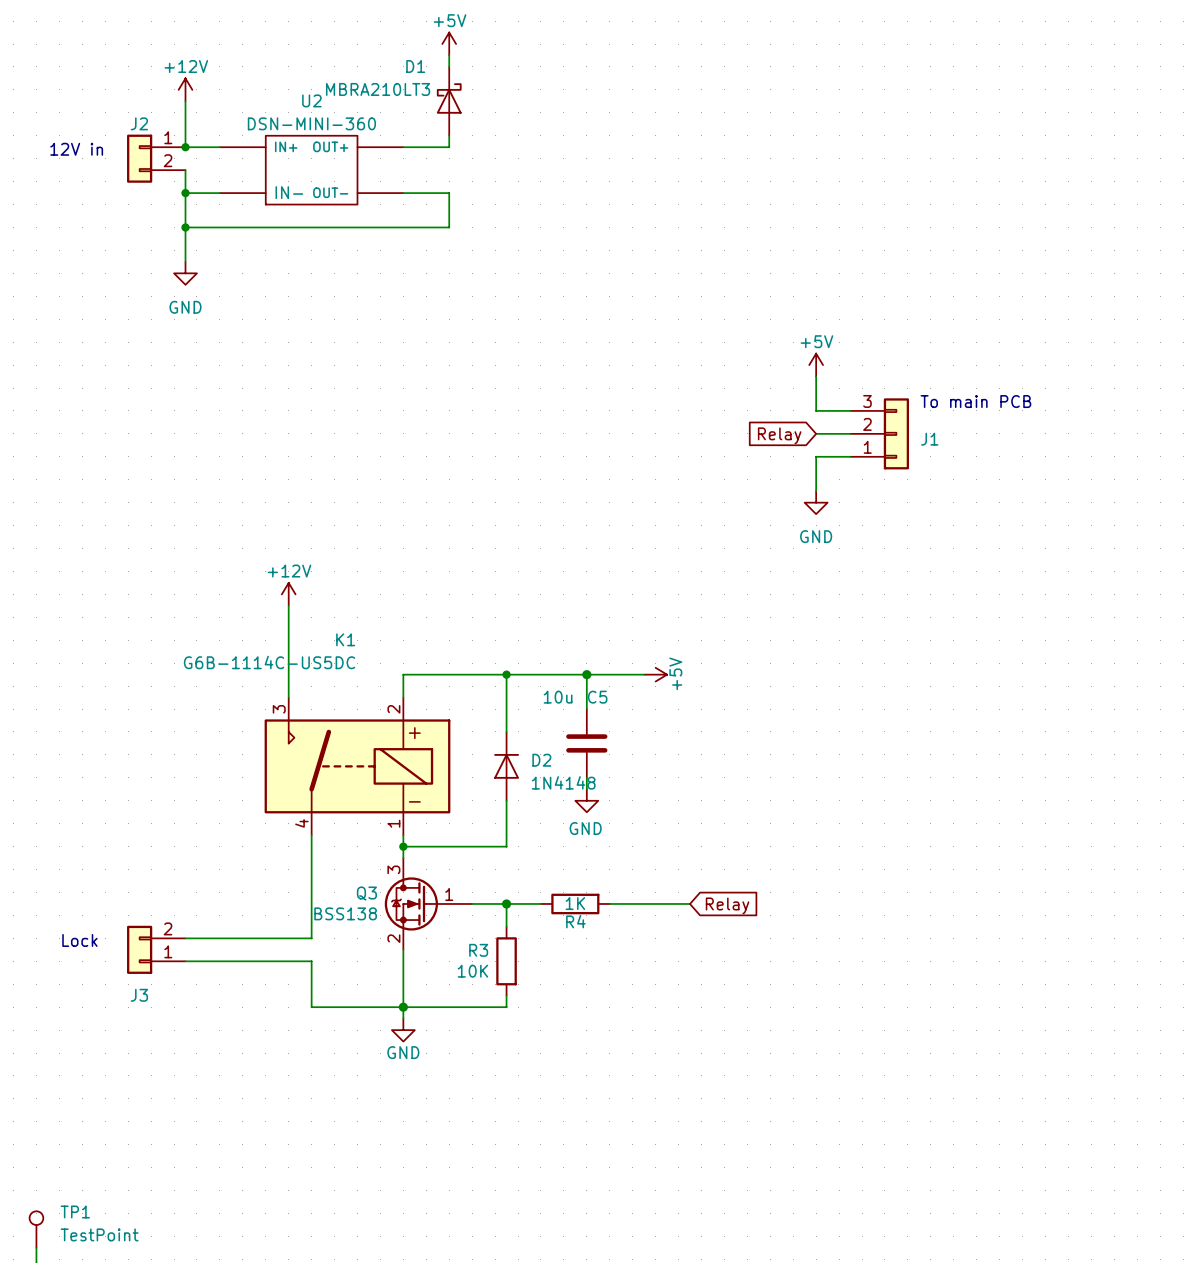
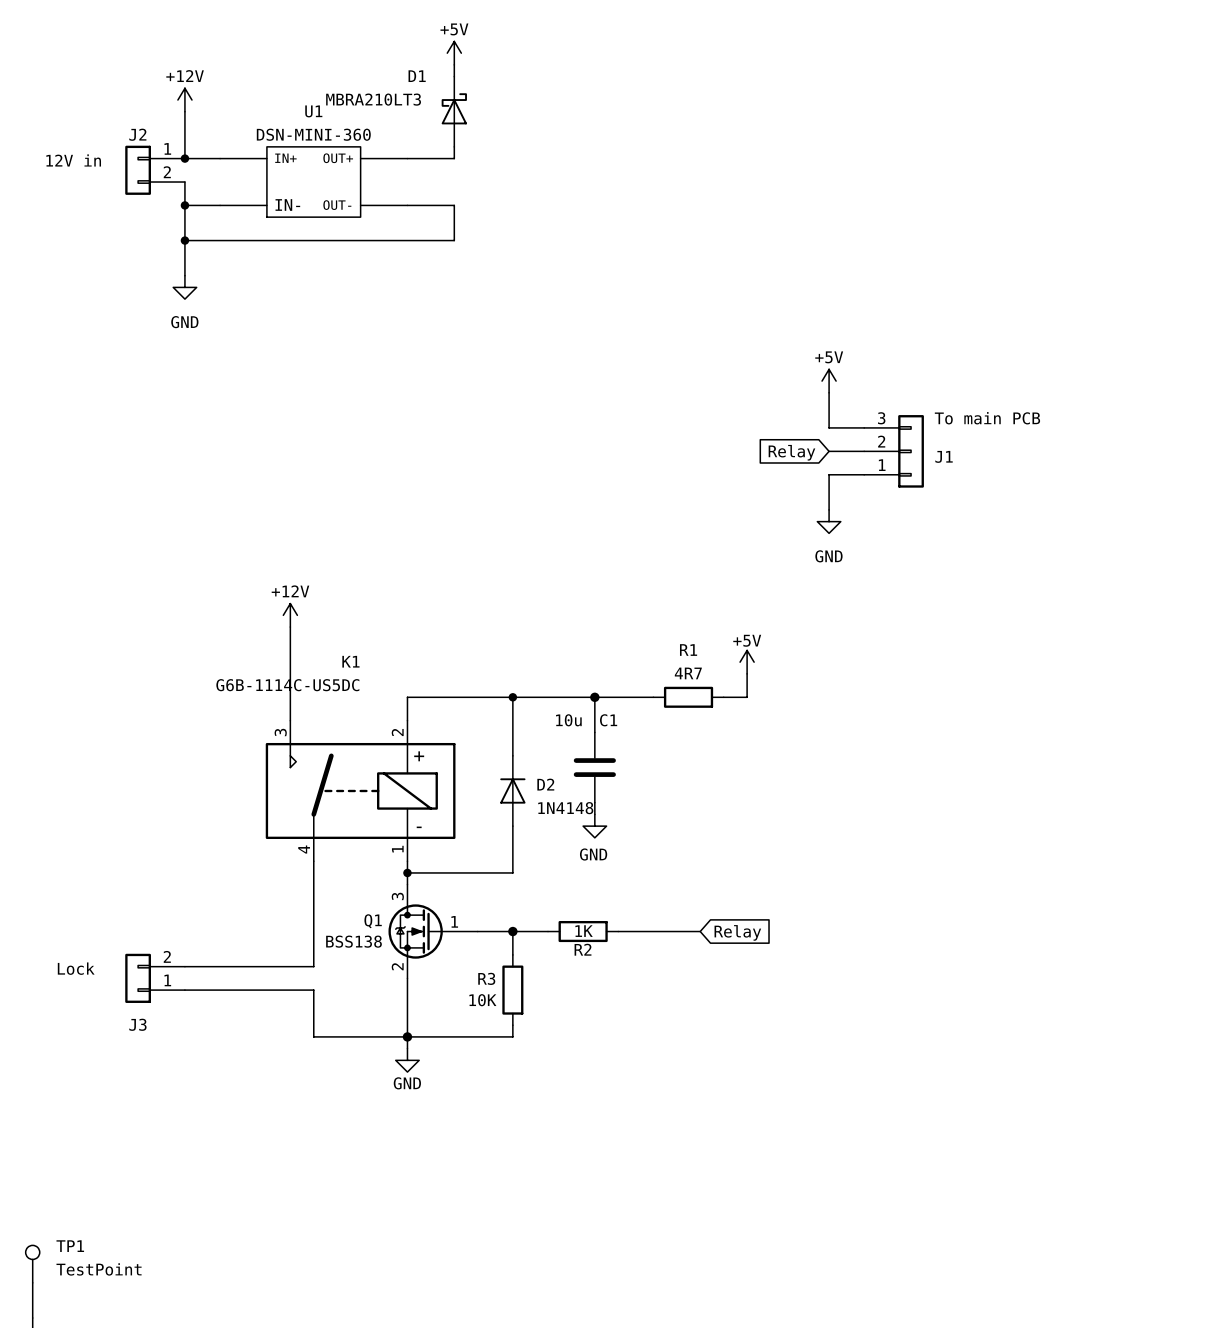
U2 name: U2 (311, 100) -> U1 (313, 111)
wire: none -> (747, 673) (747, 697) (723, 697)
power symbol rotation: 0° (655, 674) -> 90° counterclockwise (747, 662)
power symbol position: +5V (655, 674) -> +5V (747, 662)
R1: none -> 4R7 (688, 697)
C5 name: C5 (597, 697) -> C1 (608, 720)
Q3 name: Q3 (366, 893) -> Q1 (373, 921)
R4 name: R4 (575, 921) -> R2 (583, 949)

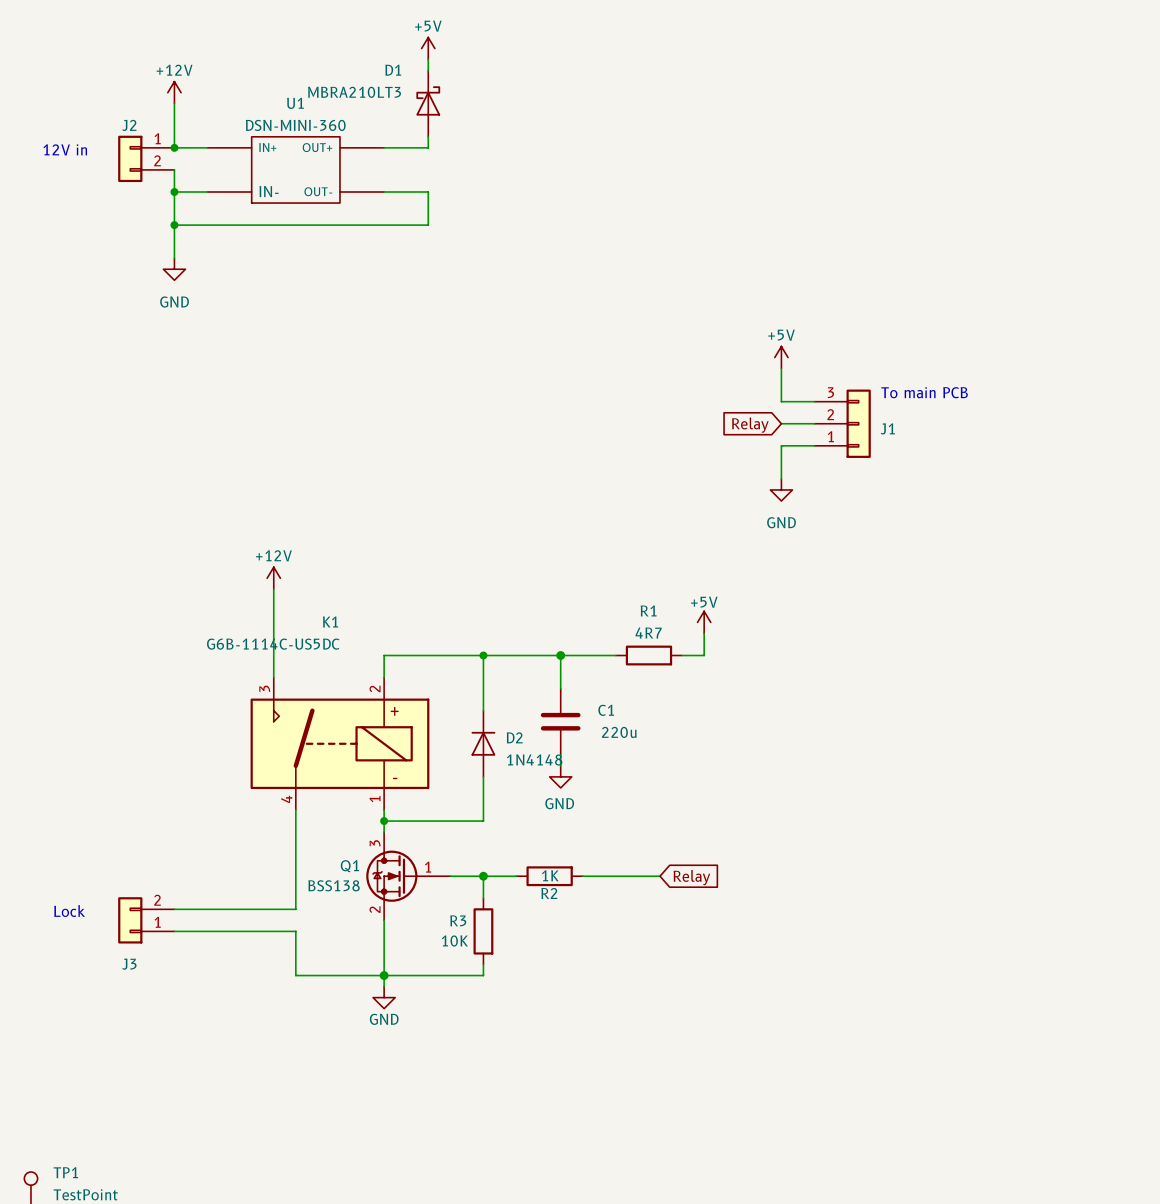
C1 value: 10u (568, 720) -> 220u (619, 732)
C1 name position: C1 (608, 720) -> C1 (606, 710)

